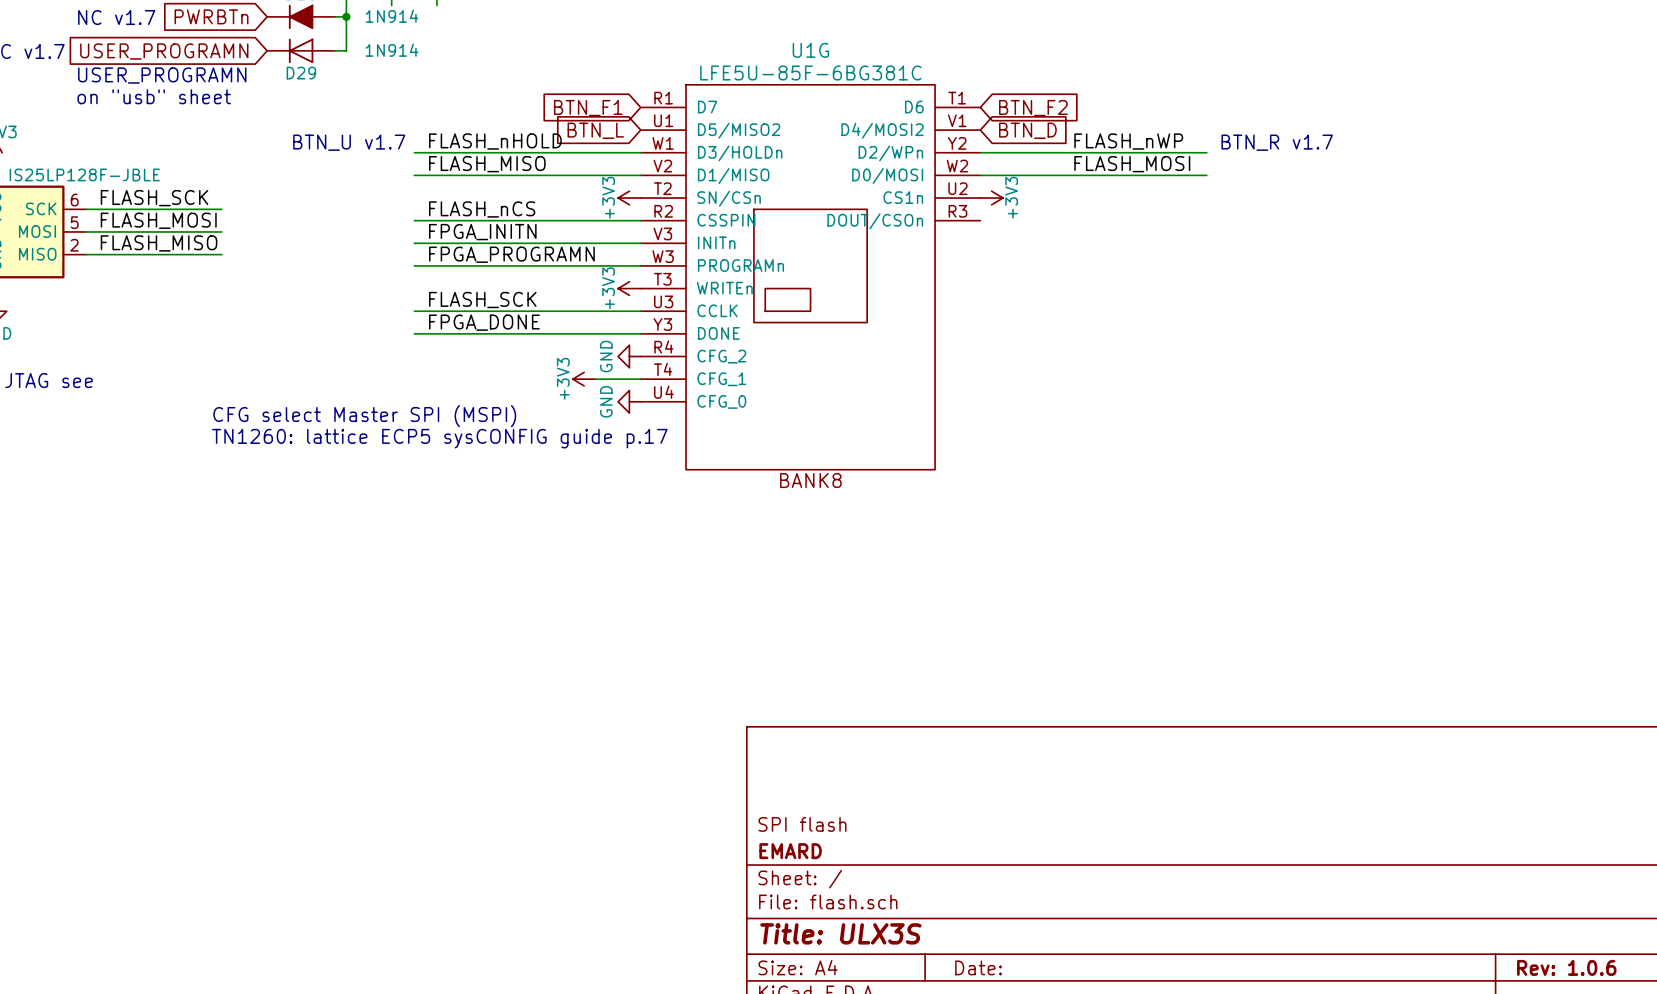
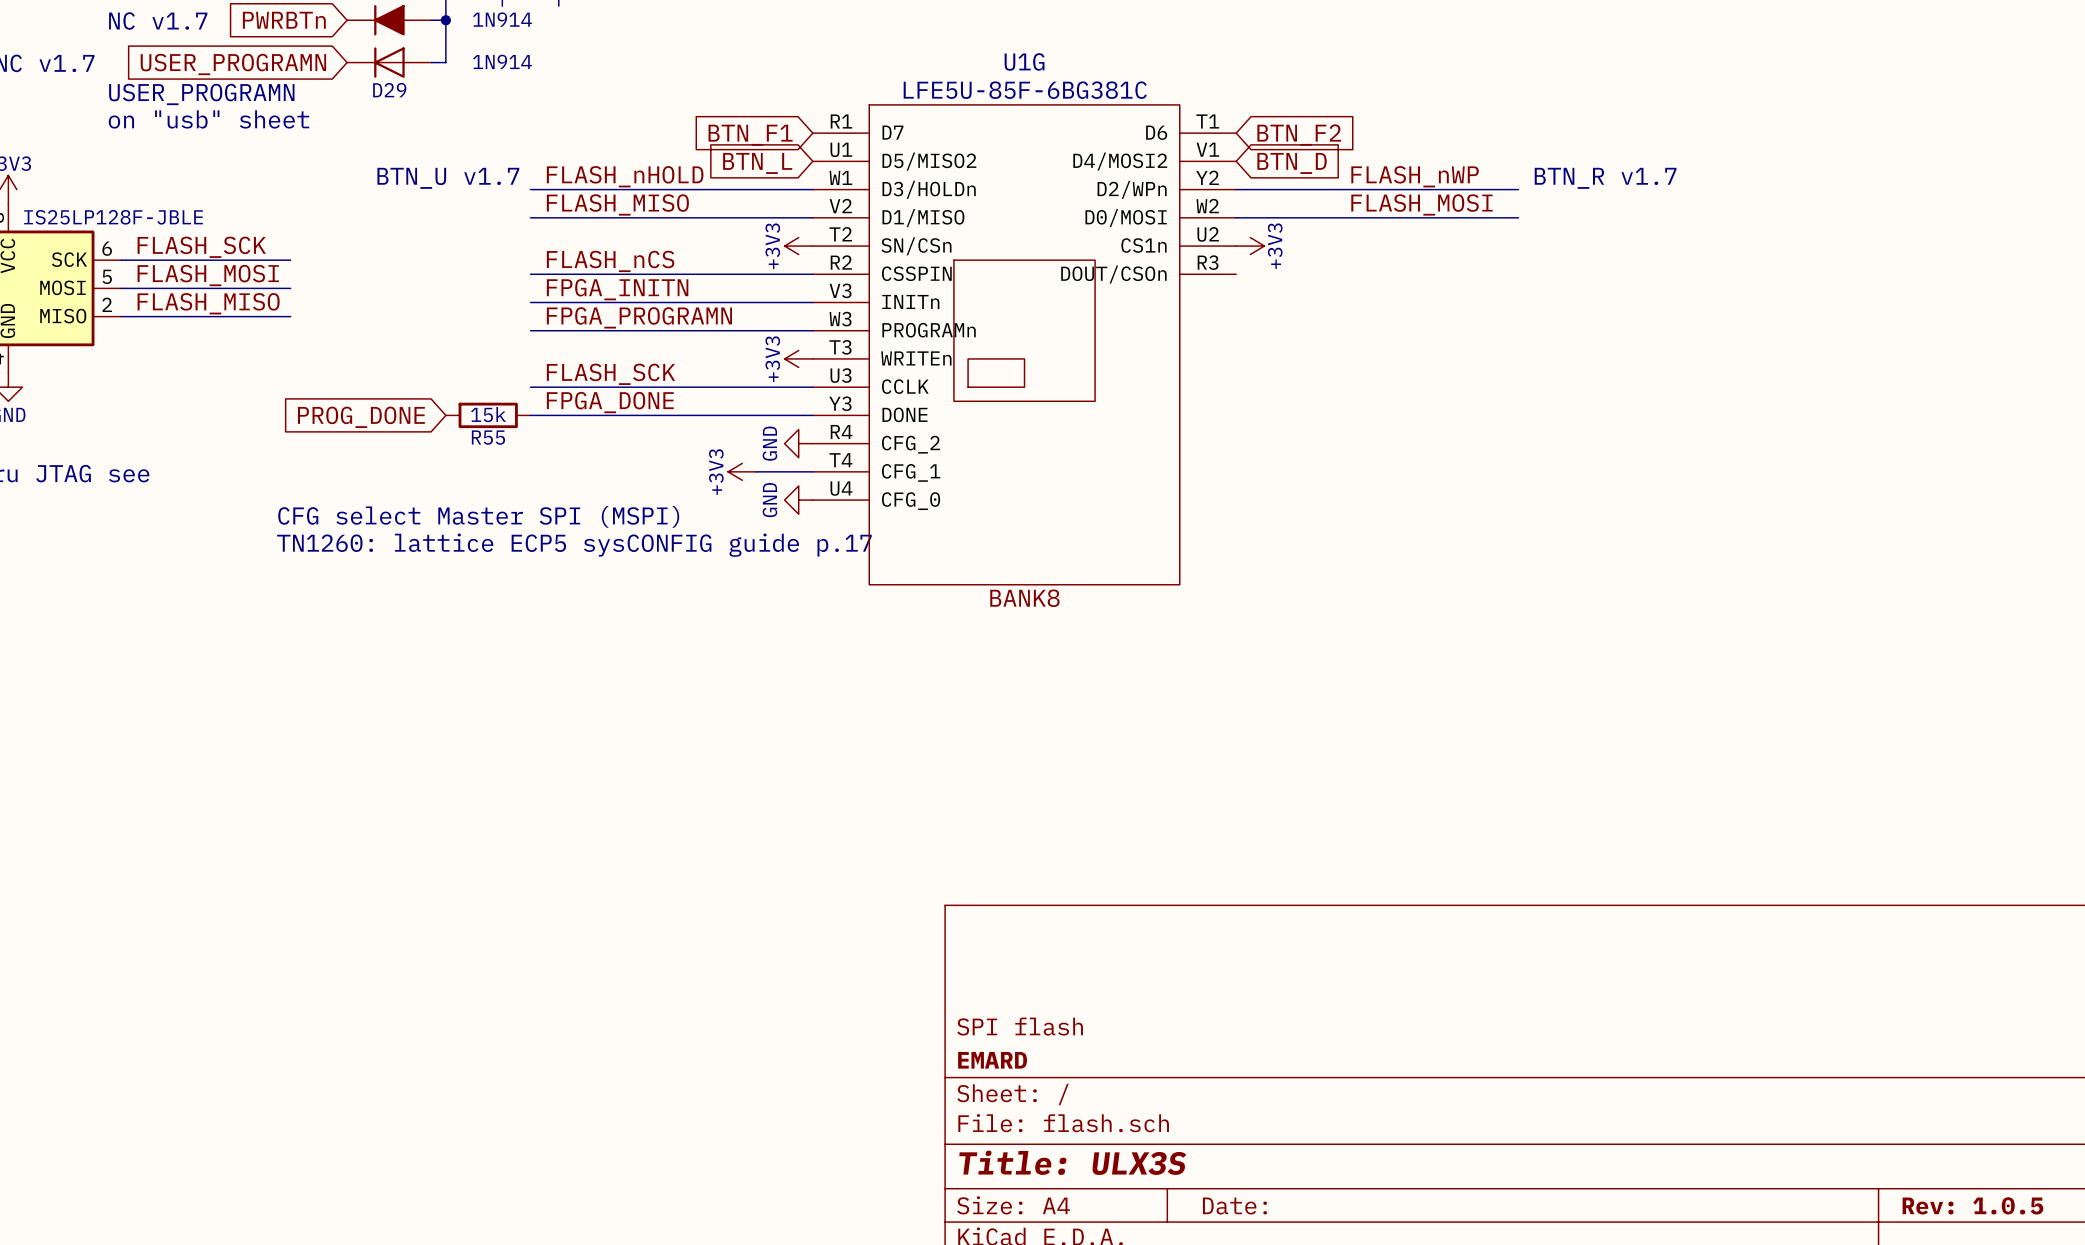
R55: none -> 15k (488, 415)
global label: none -> PROG_DONE (361, 417)
title block: Rev: 1.0.6 (1566, 967) -> Rev: 1.0.5 (1972, 1205)

